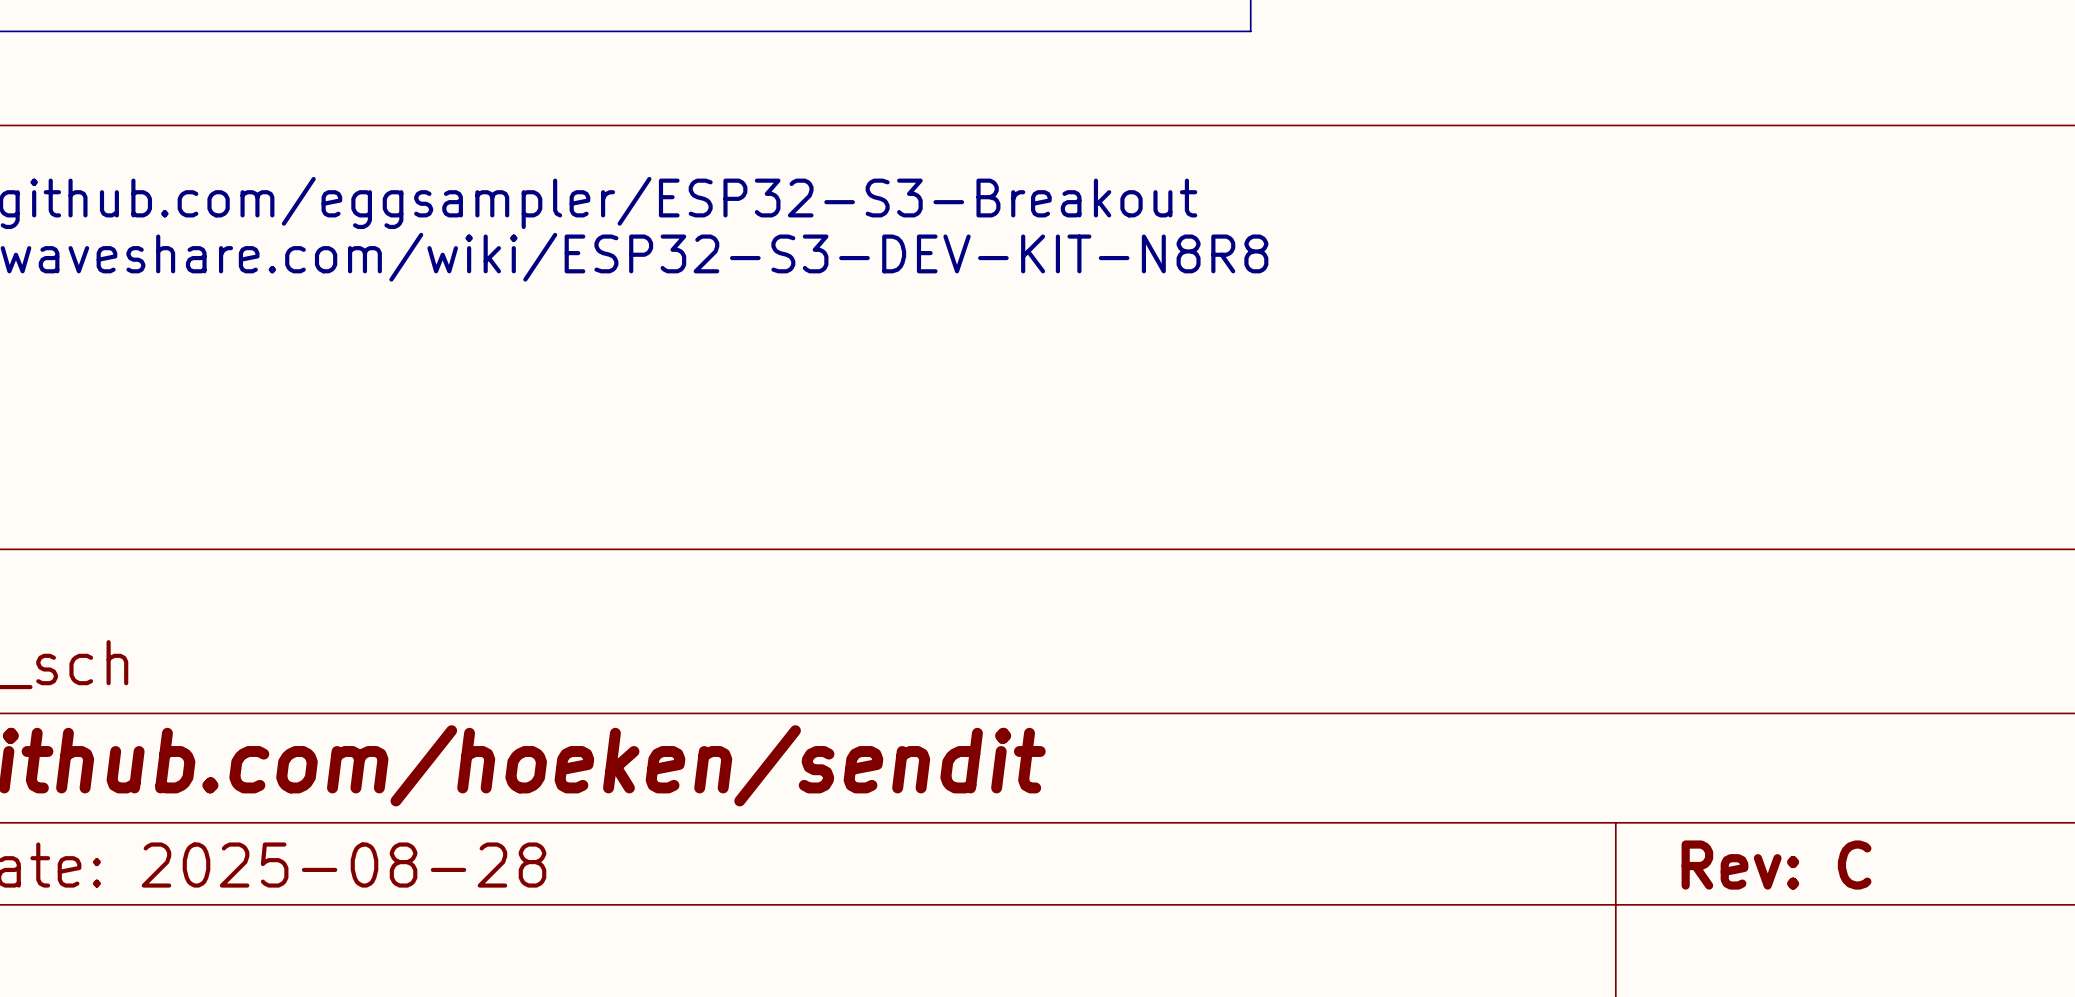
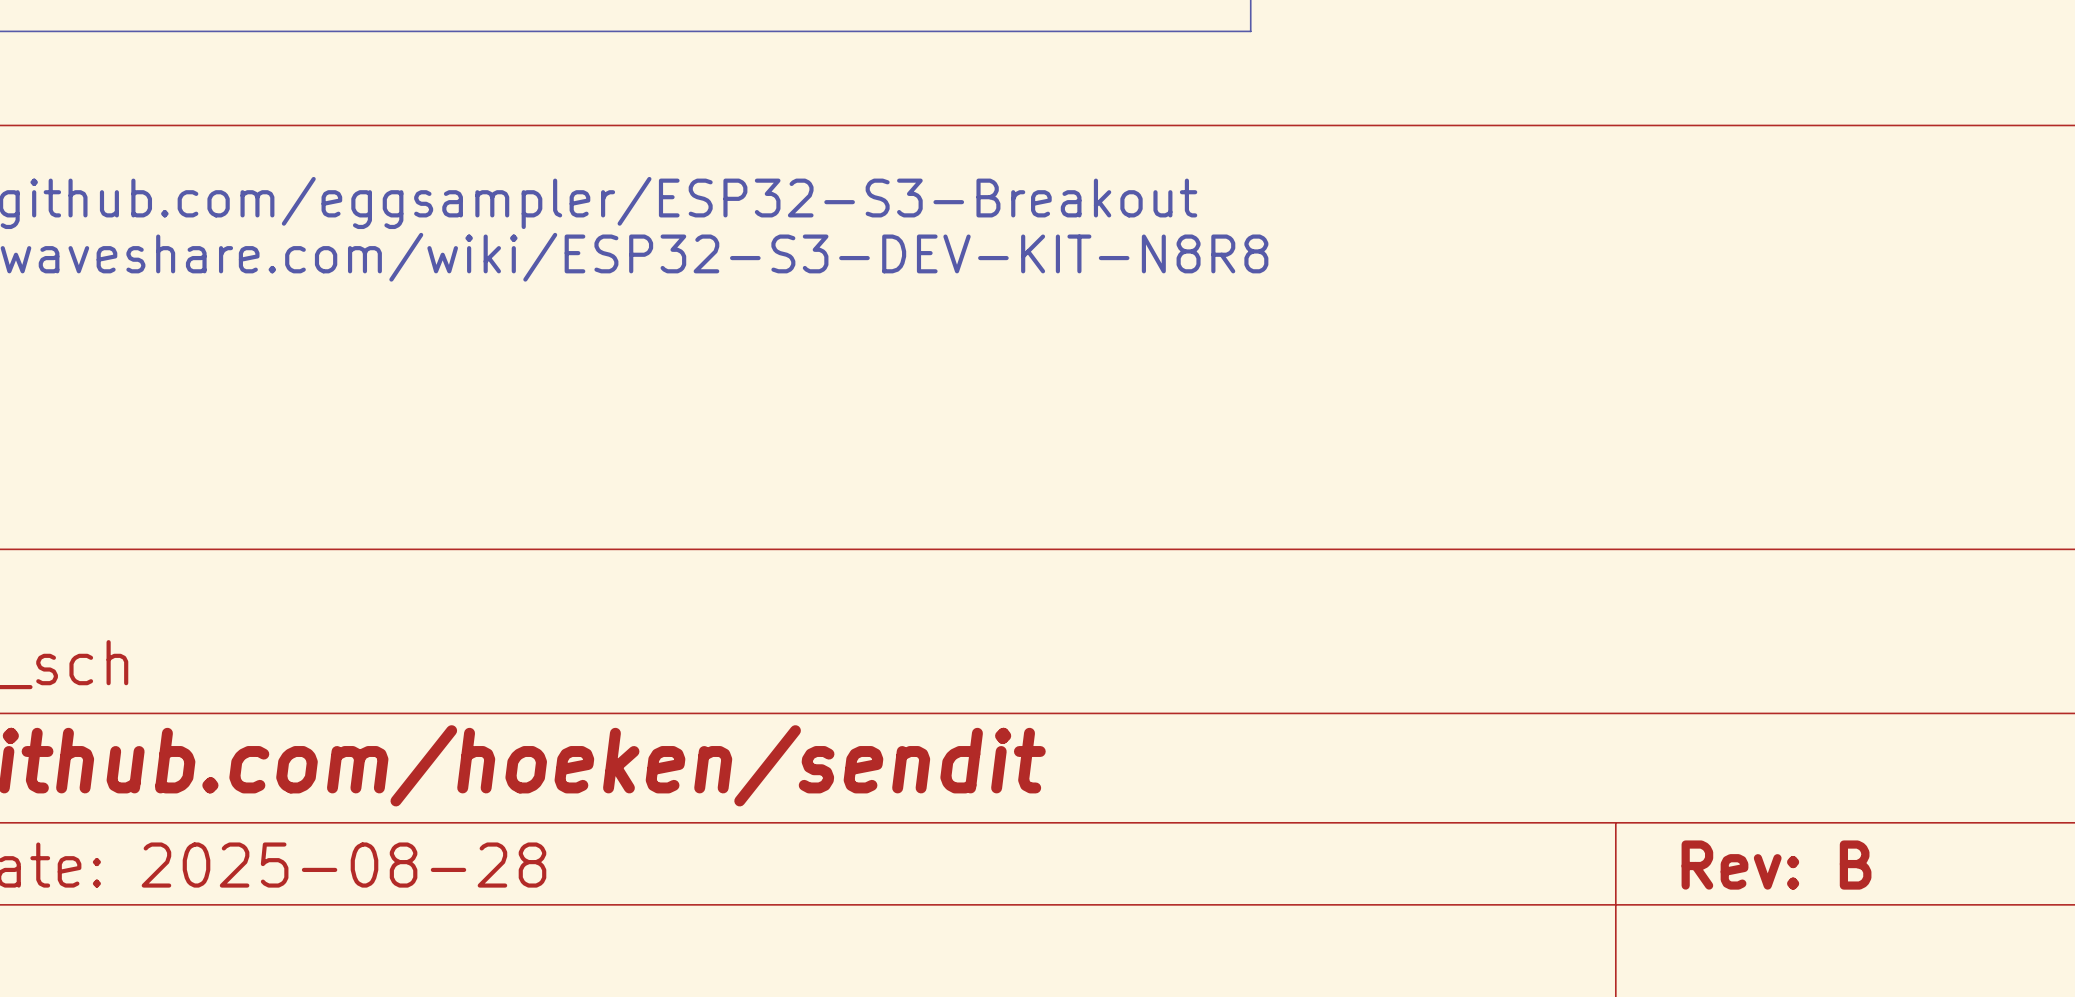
title block: Rev: C (1776, 865) -> Rev: B (1776, 865)

